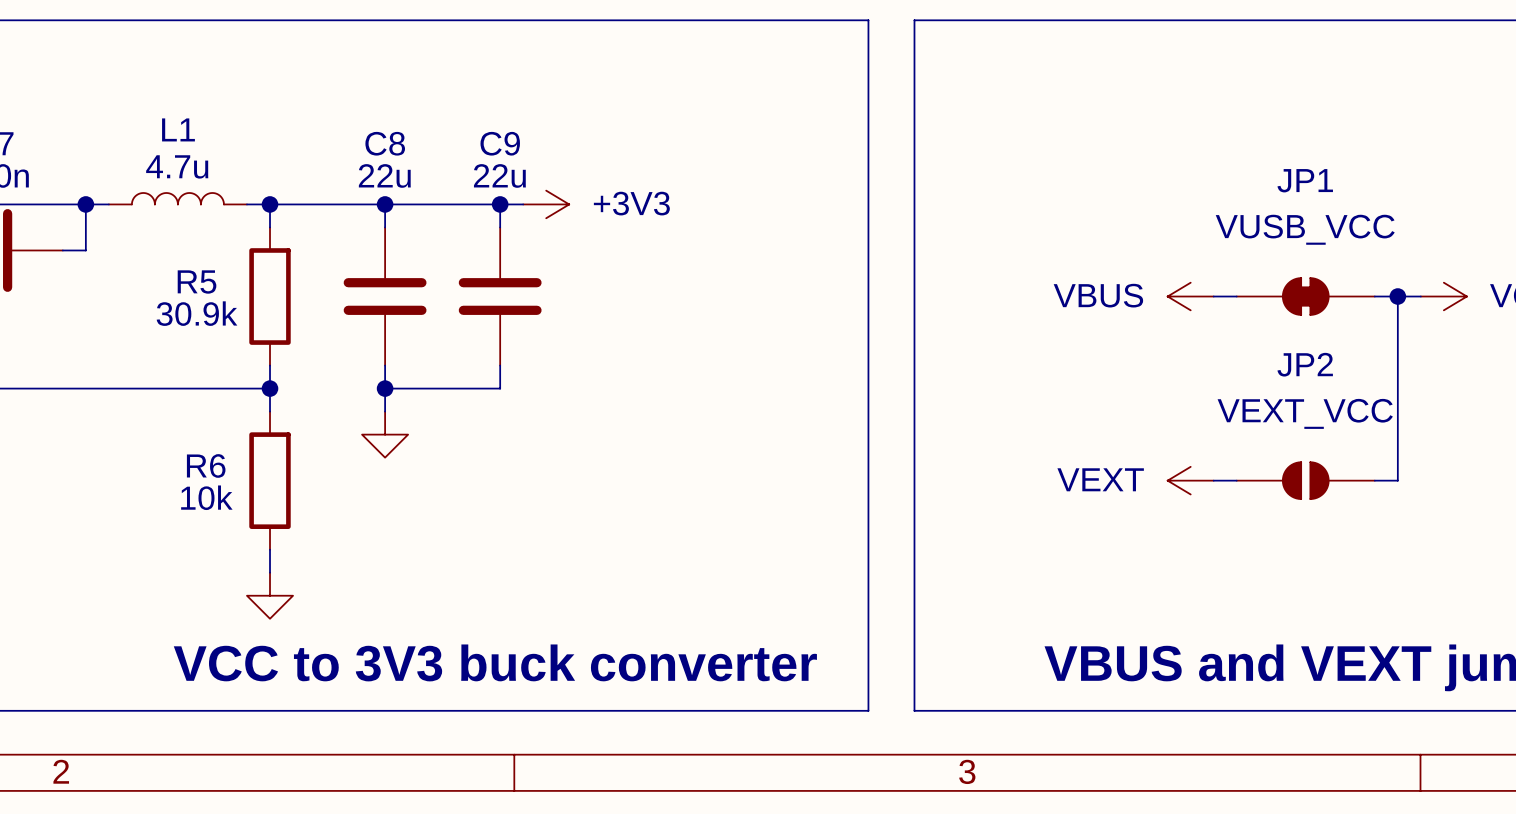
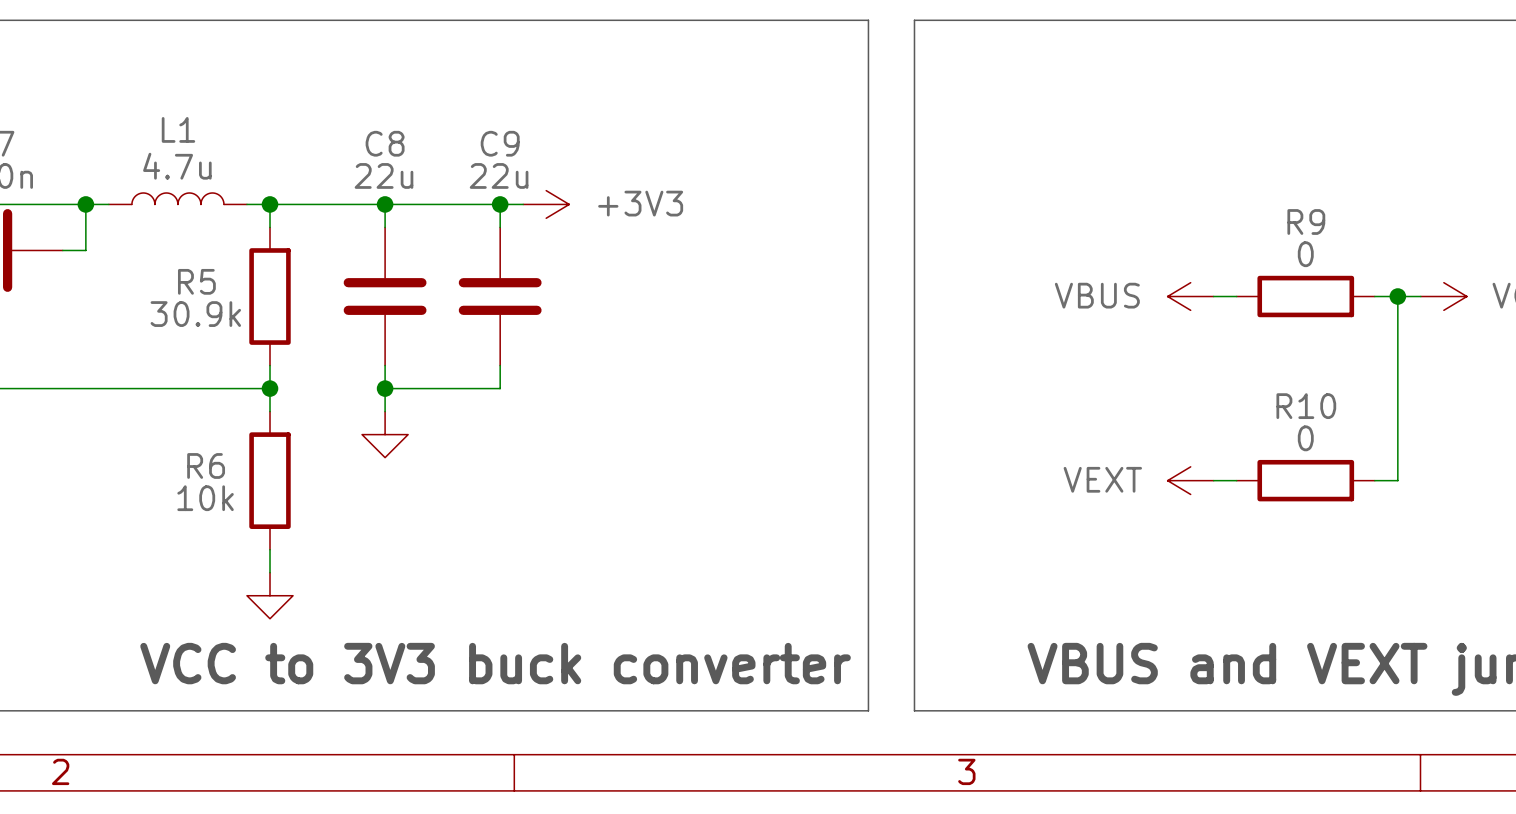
JP1: VUSB_VCC (1305, 296) -> none
R9: none -> 0 (1305, 296)
JP2: VEXT_VCC (1305, 480) -> none
R10: none -> 0 (1305, 480)

